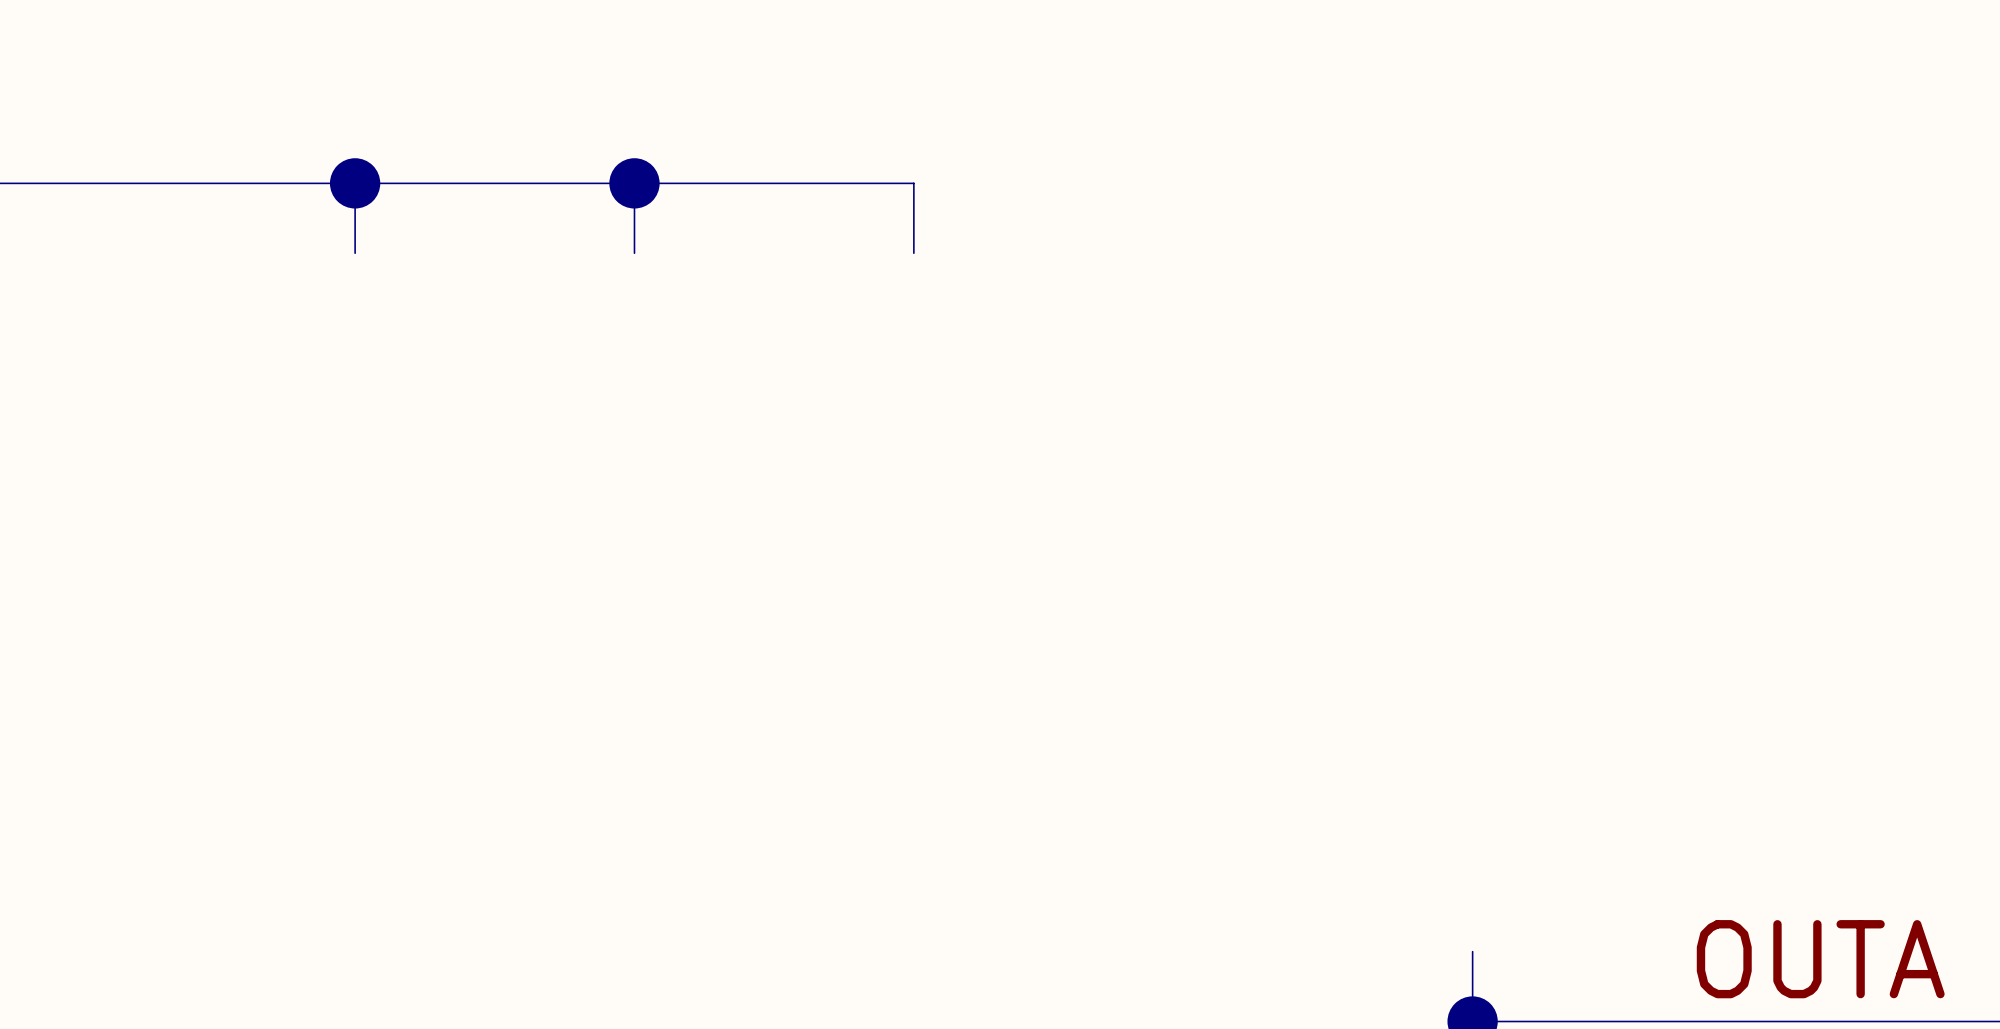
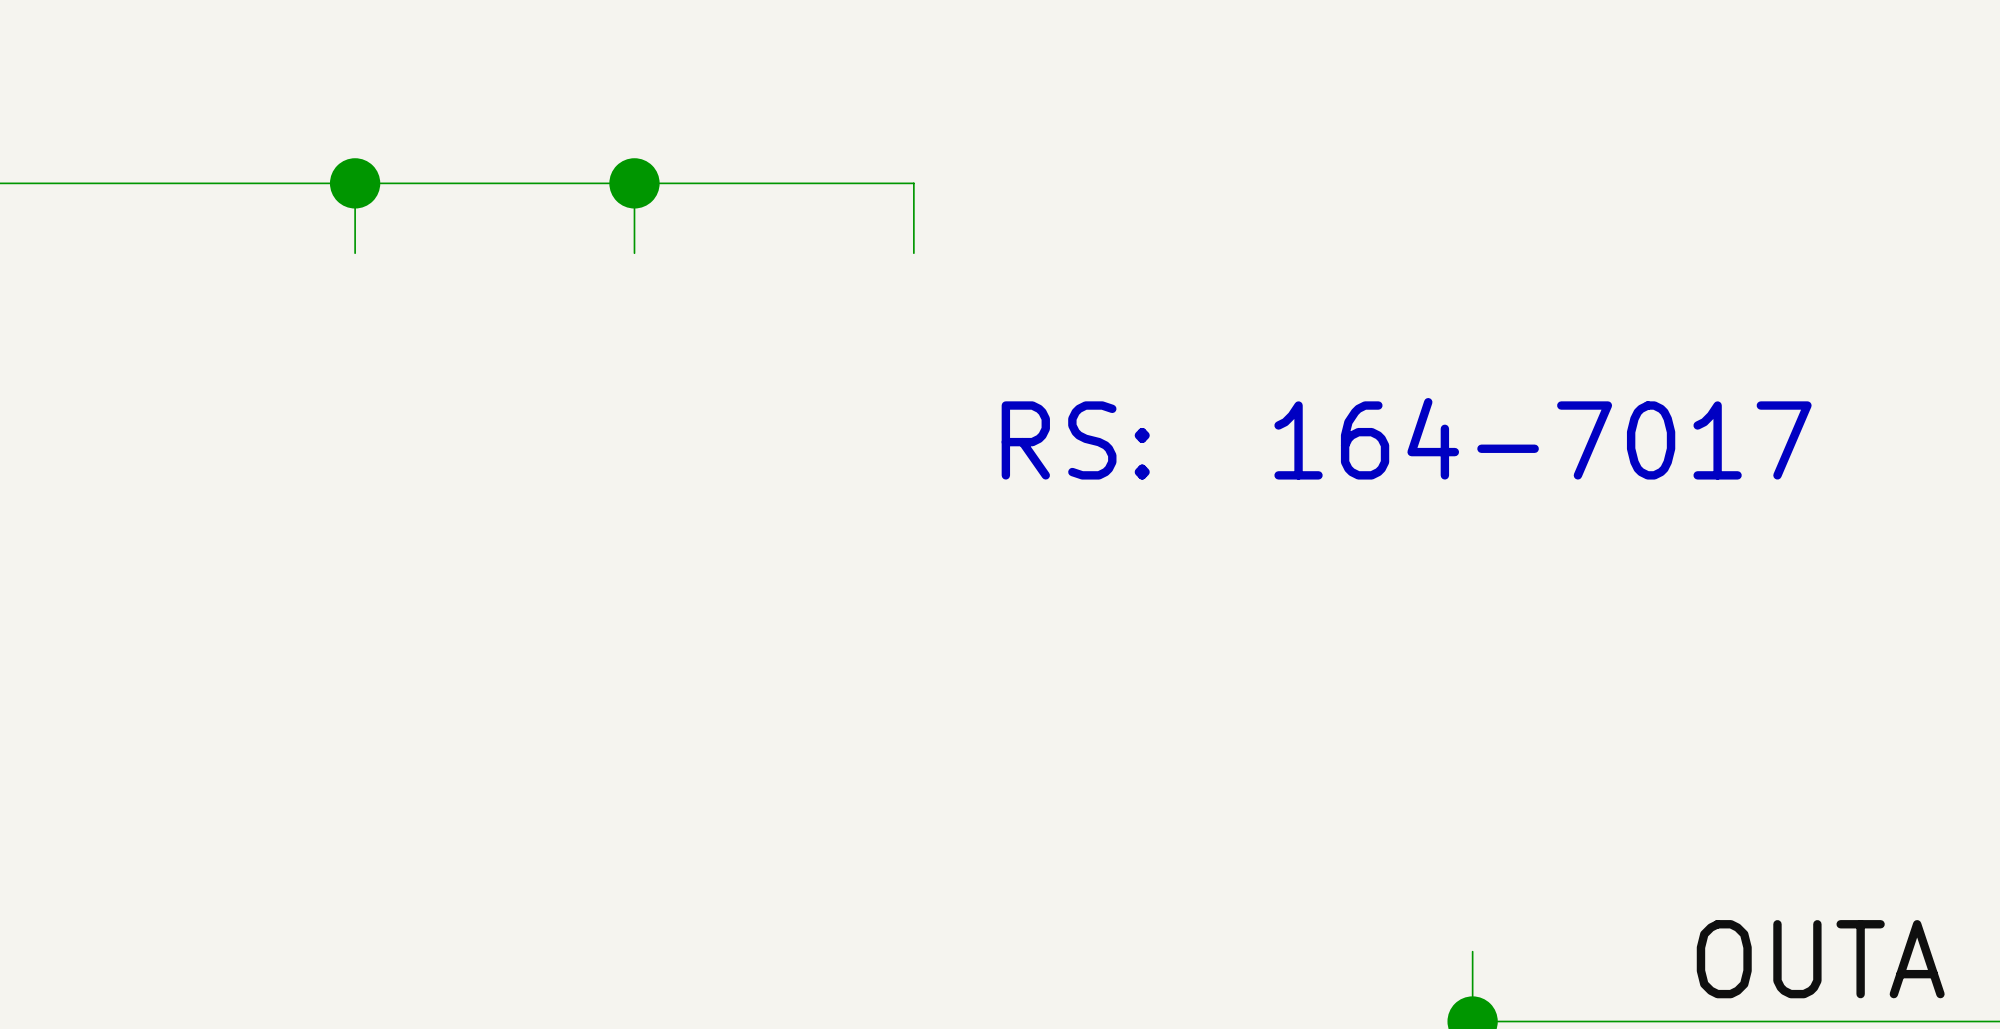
text: none -> RS: 164-7017 (1406, 438)

